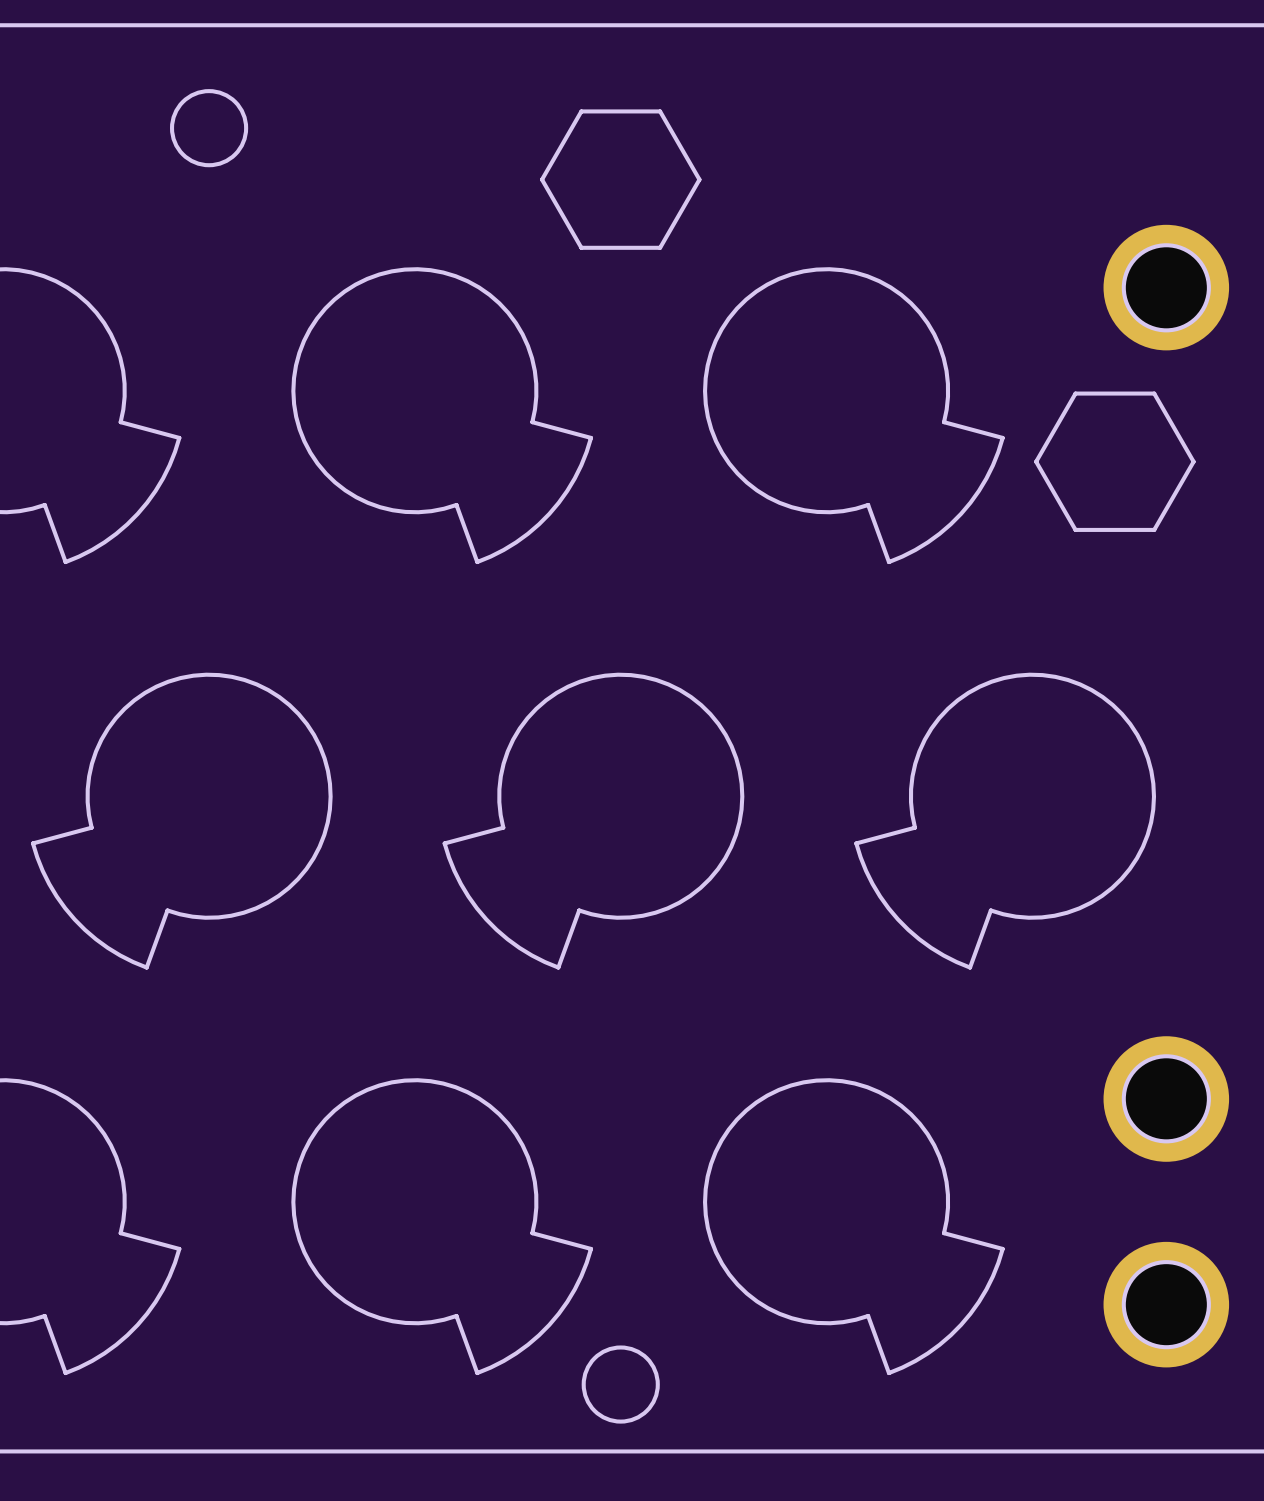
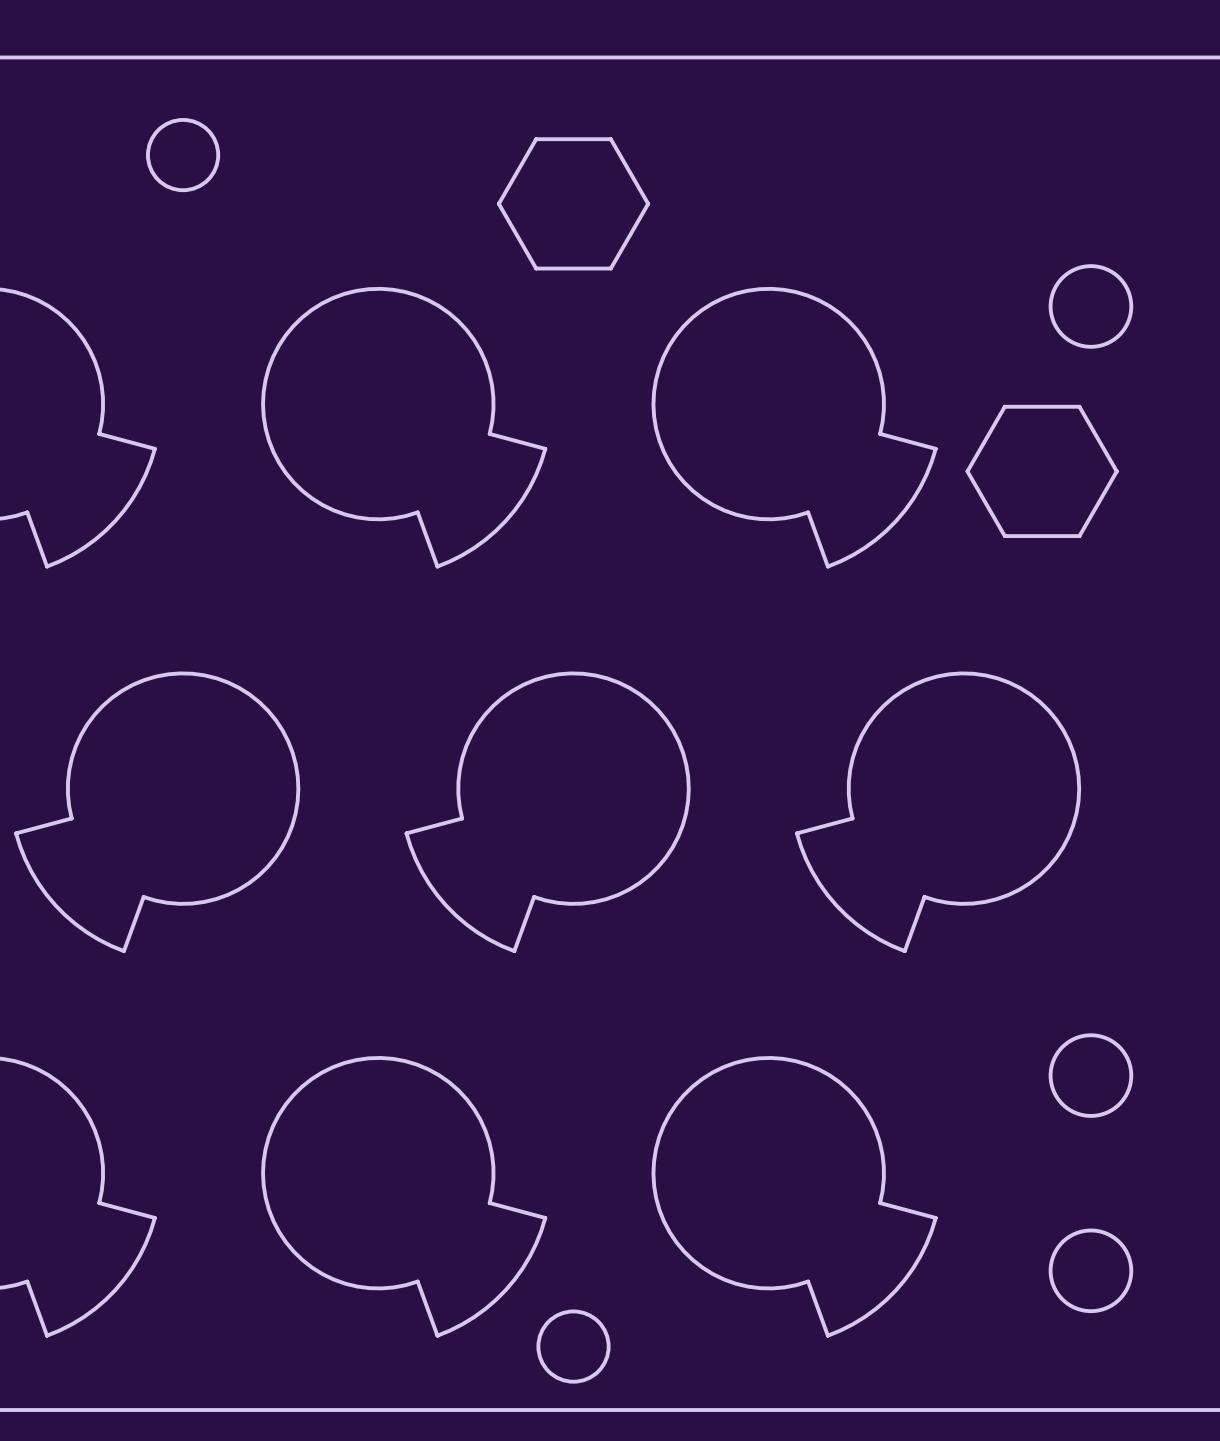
part: (1166, 287) -> none
part: (1166, 1099) -> none
part: (1166, 1304) -> none

